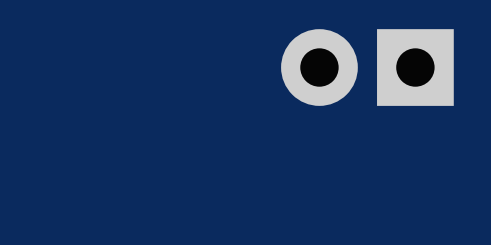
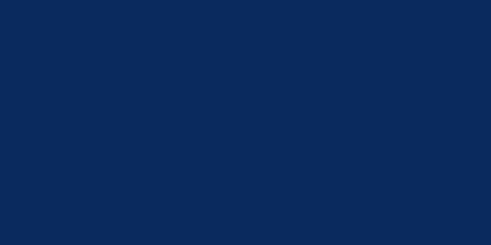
part: (367, 67) -> none

